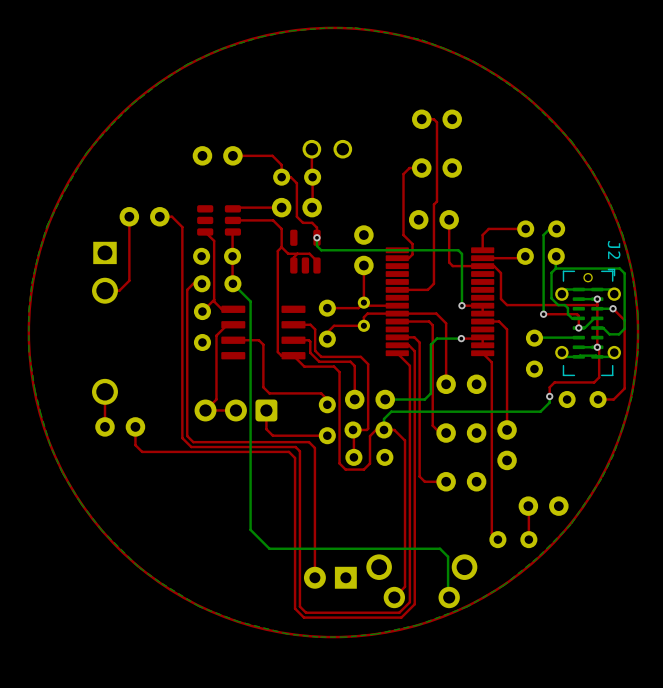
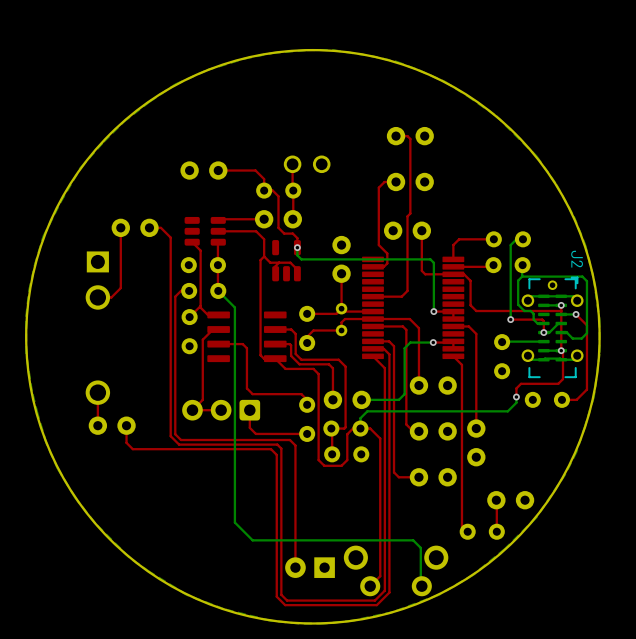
drawing: [27, 26, 640, 639] -> none
round board edge: none -> [25, 48, 601, 625]

